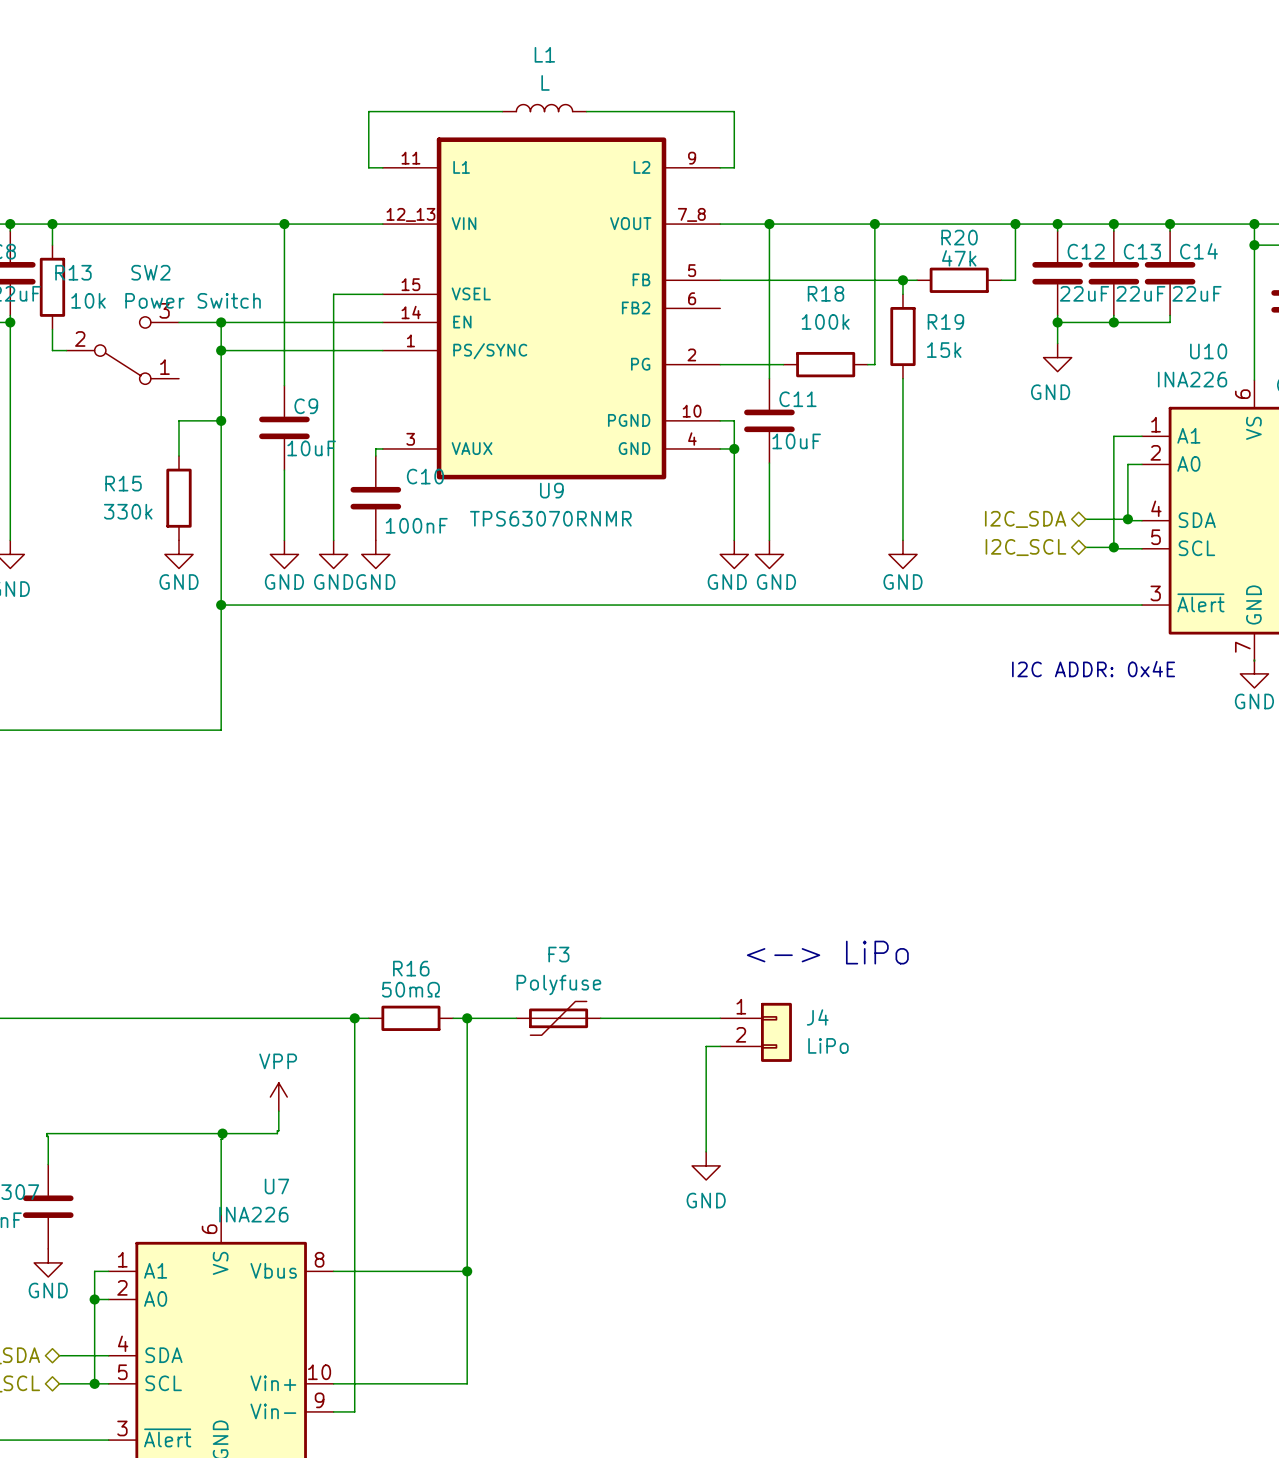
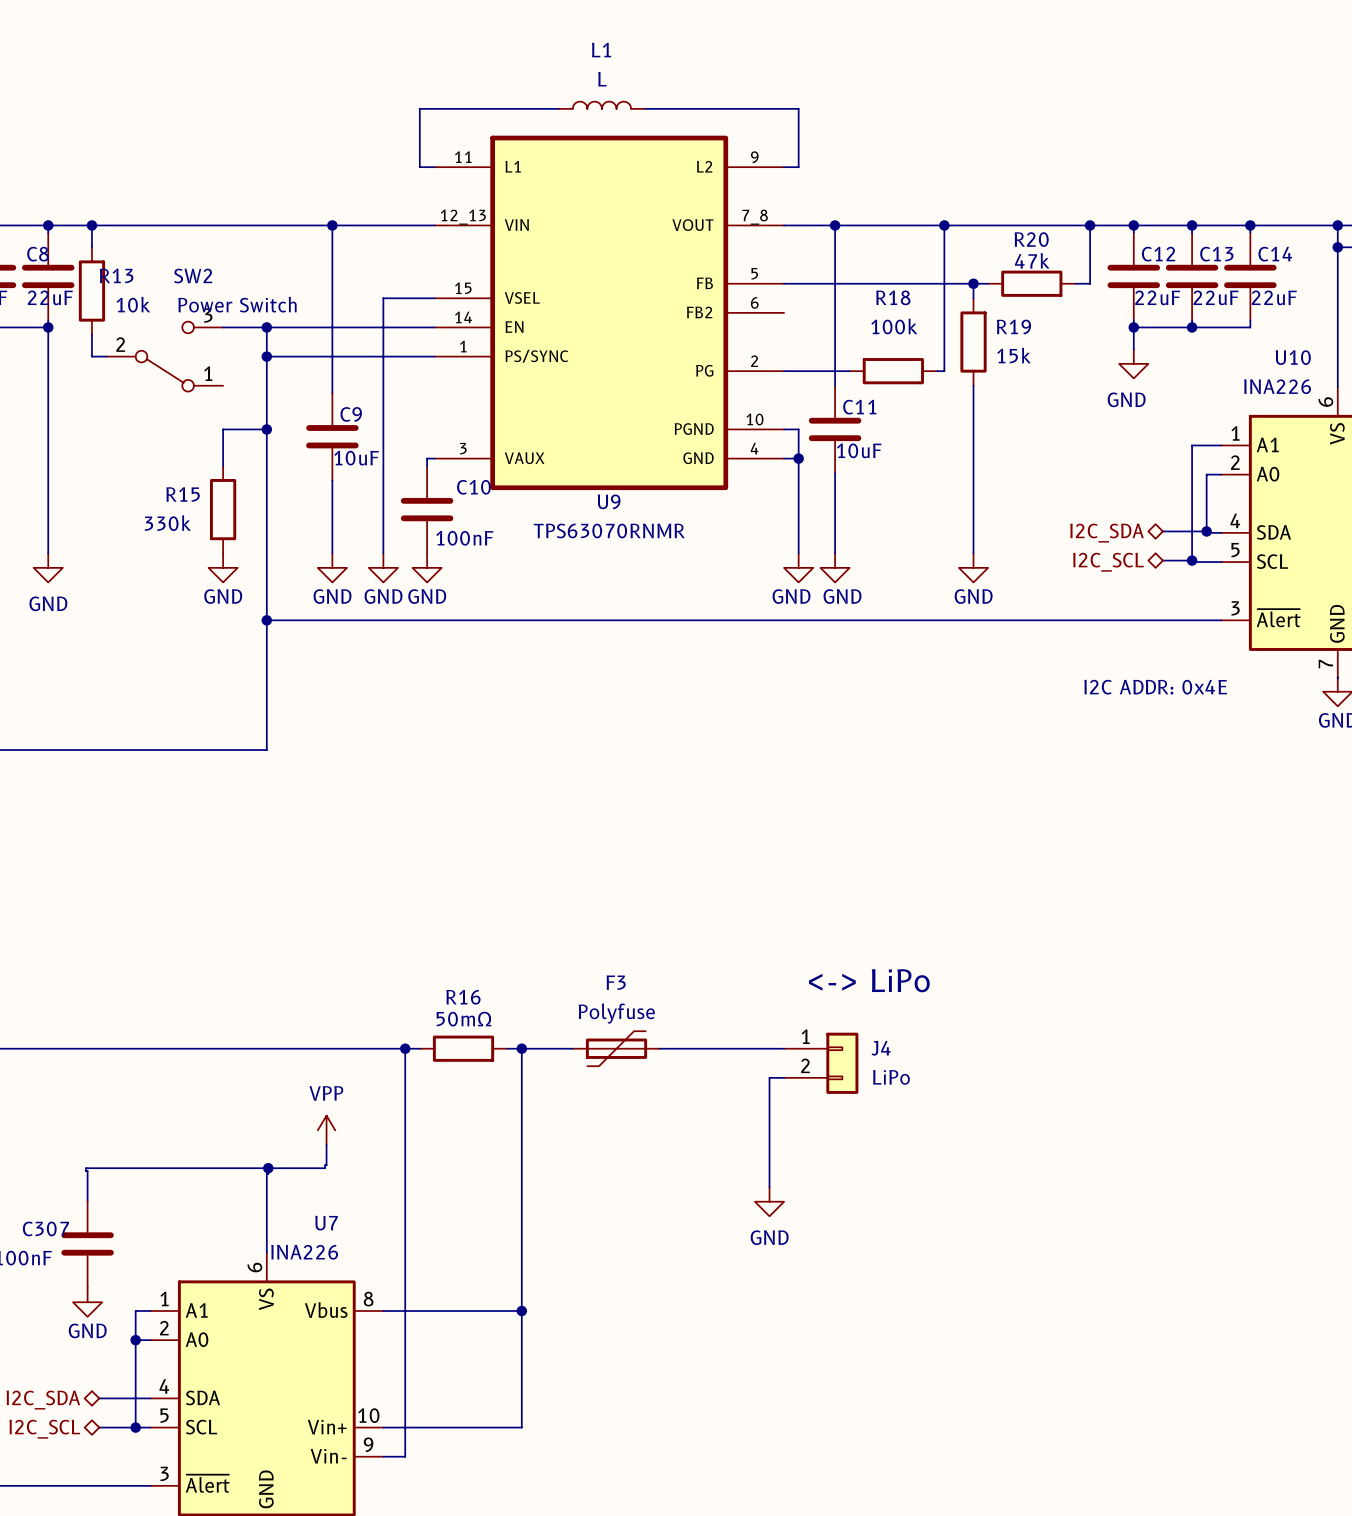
R15 name position: R15 (123, 483) -> R15 (183, 494)

